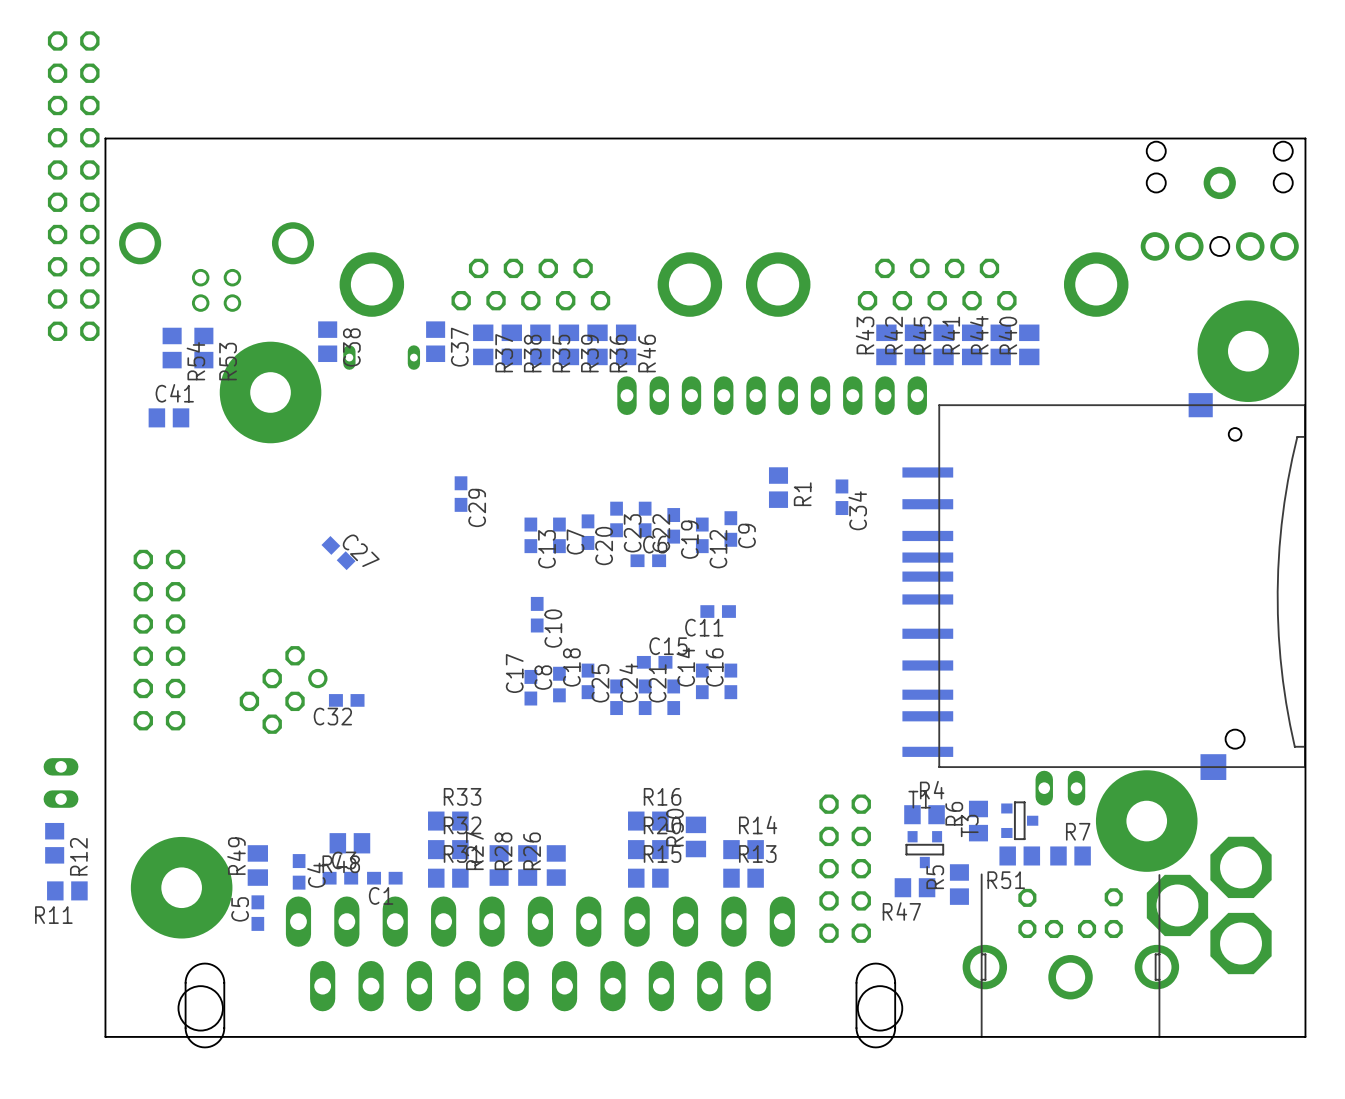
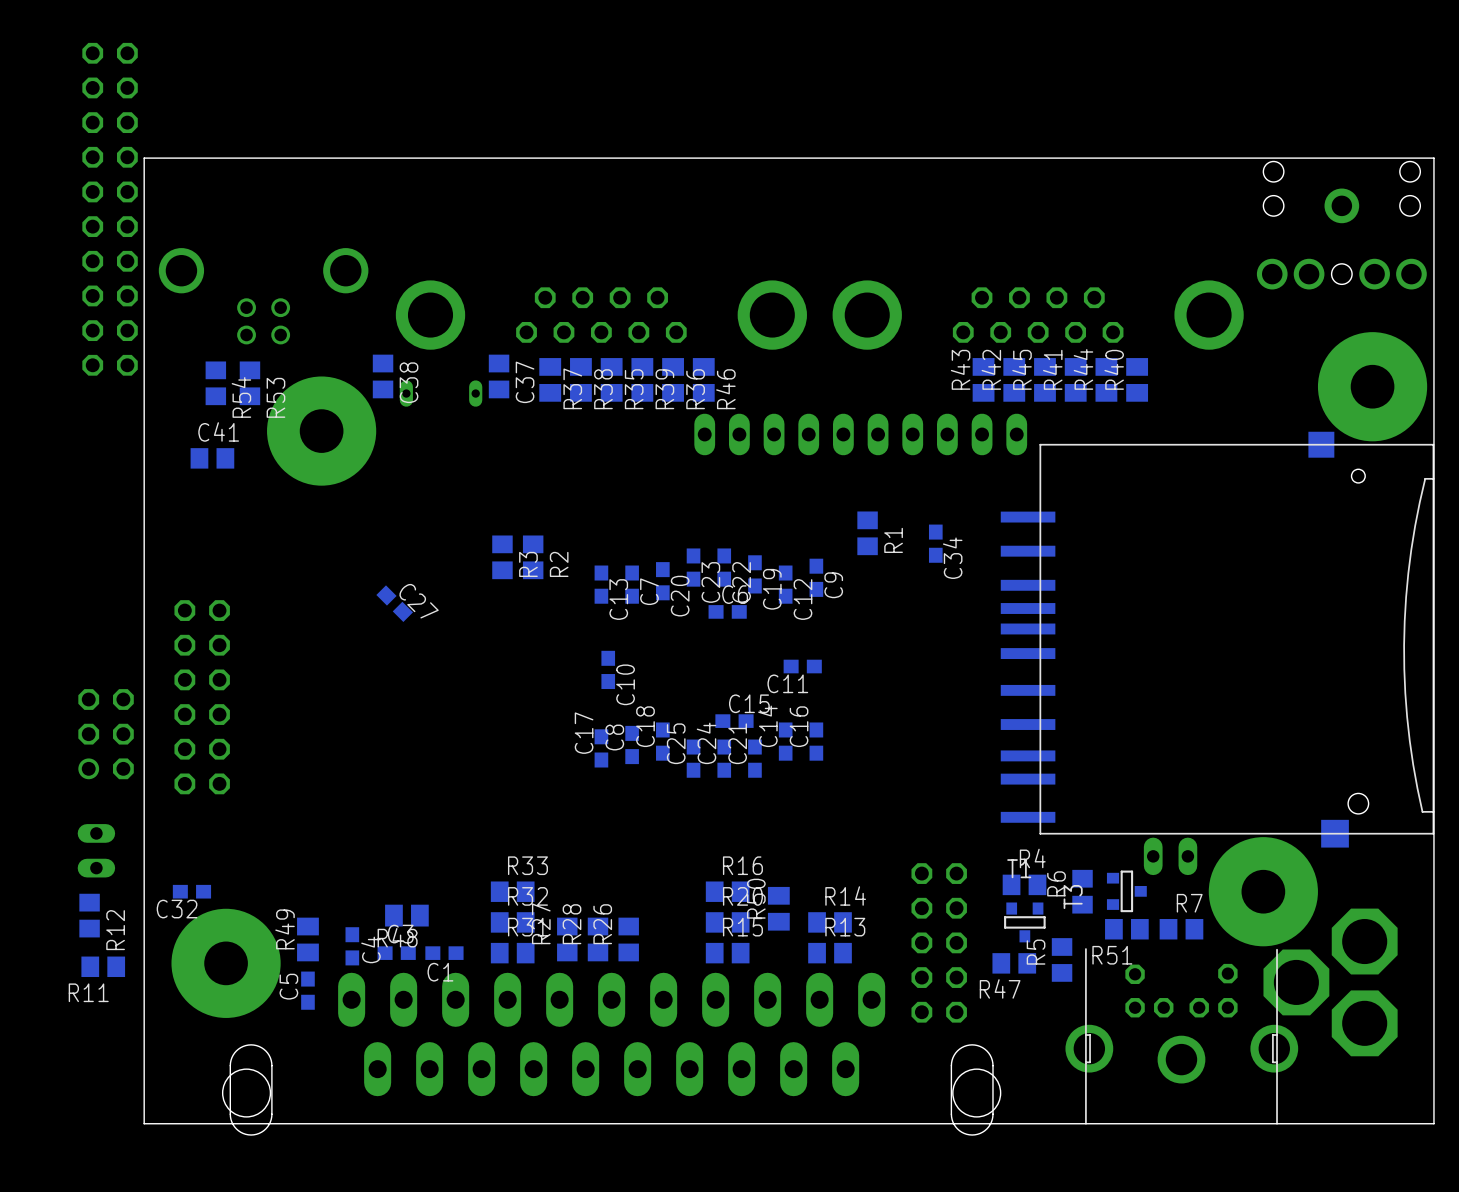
C29: (461, 494) -> none
R3: none -> (502, 557)
R2: none -> (533, 557)
part: none -> (106, 734)
part: (283, 689) -> none
C32 position: (346, 700) -> (191, 891)

